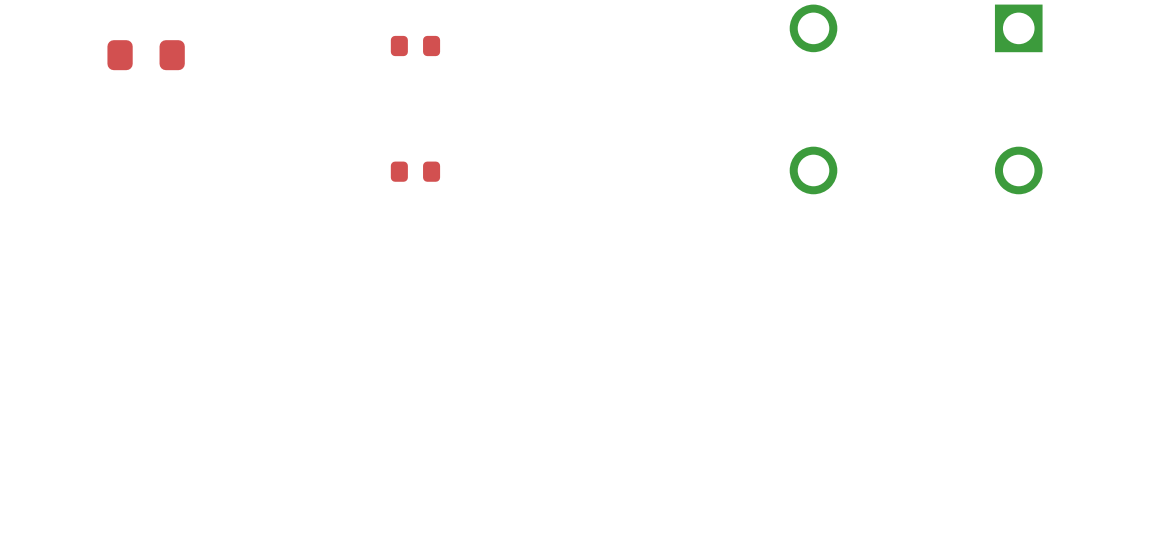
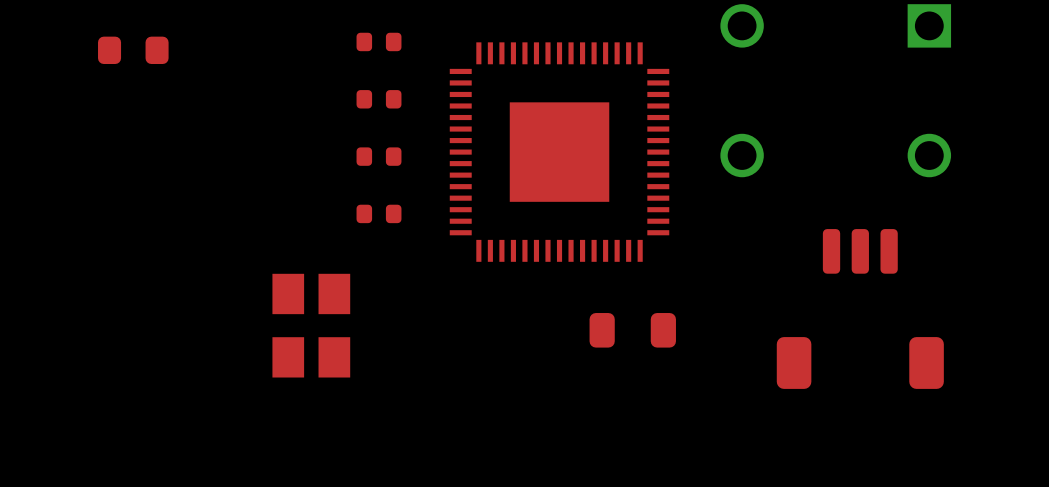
part: none -> (379, 99)
part: none -> (559, 152)
part: none -> (379, 213)
part: none -> (860, 308)
part: none -> (311, 325)
part: none -> (632, 330)

